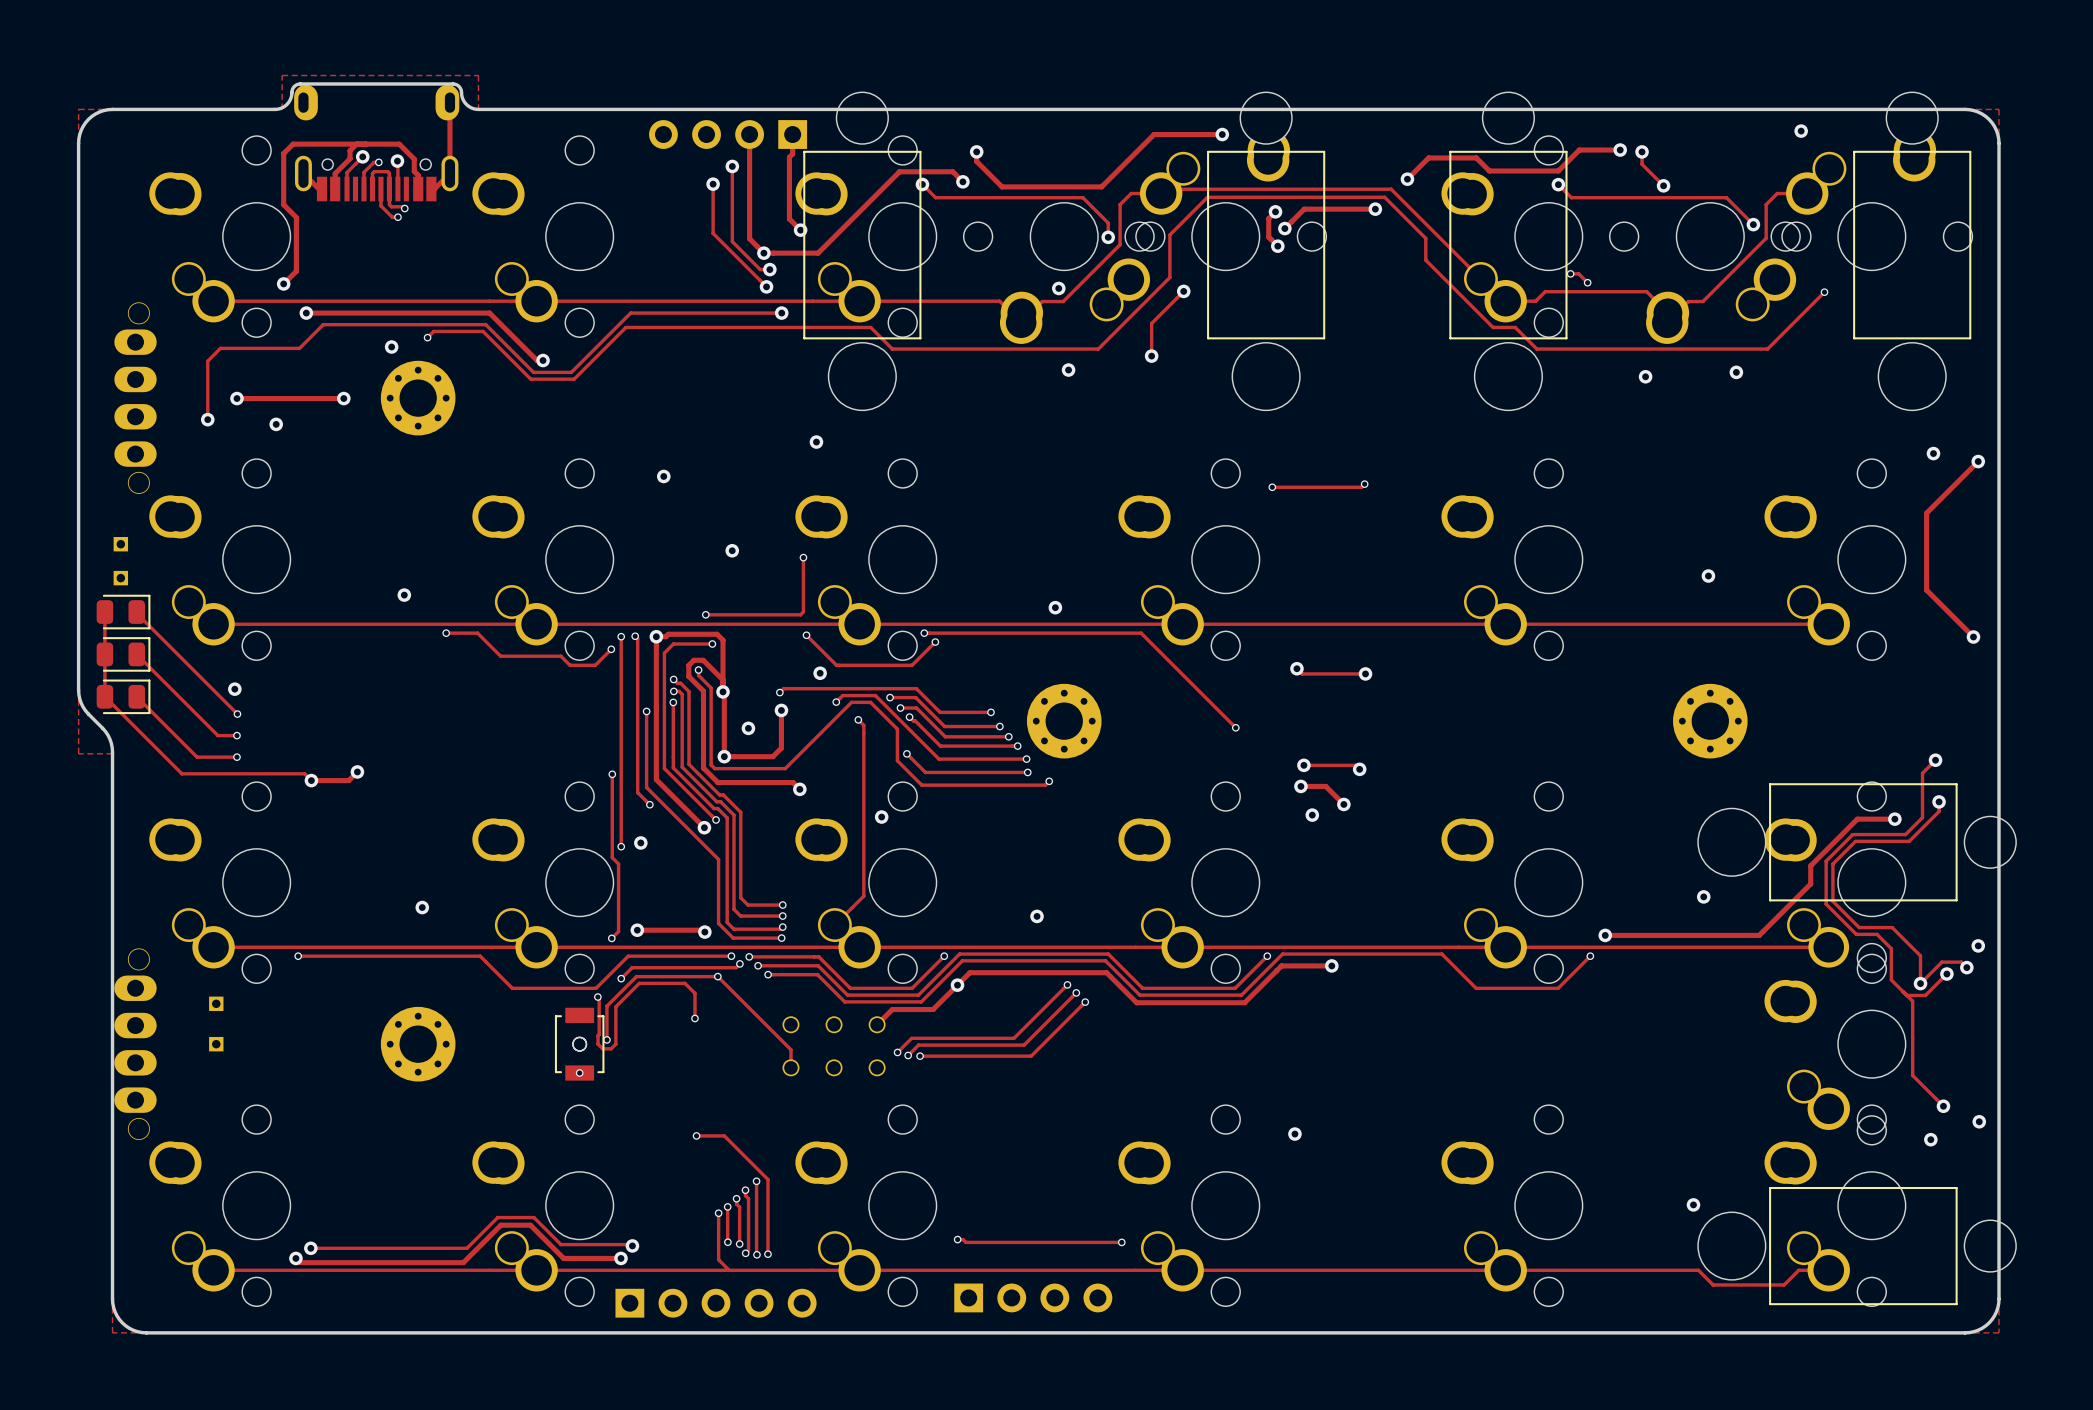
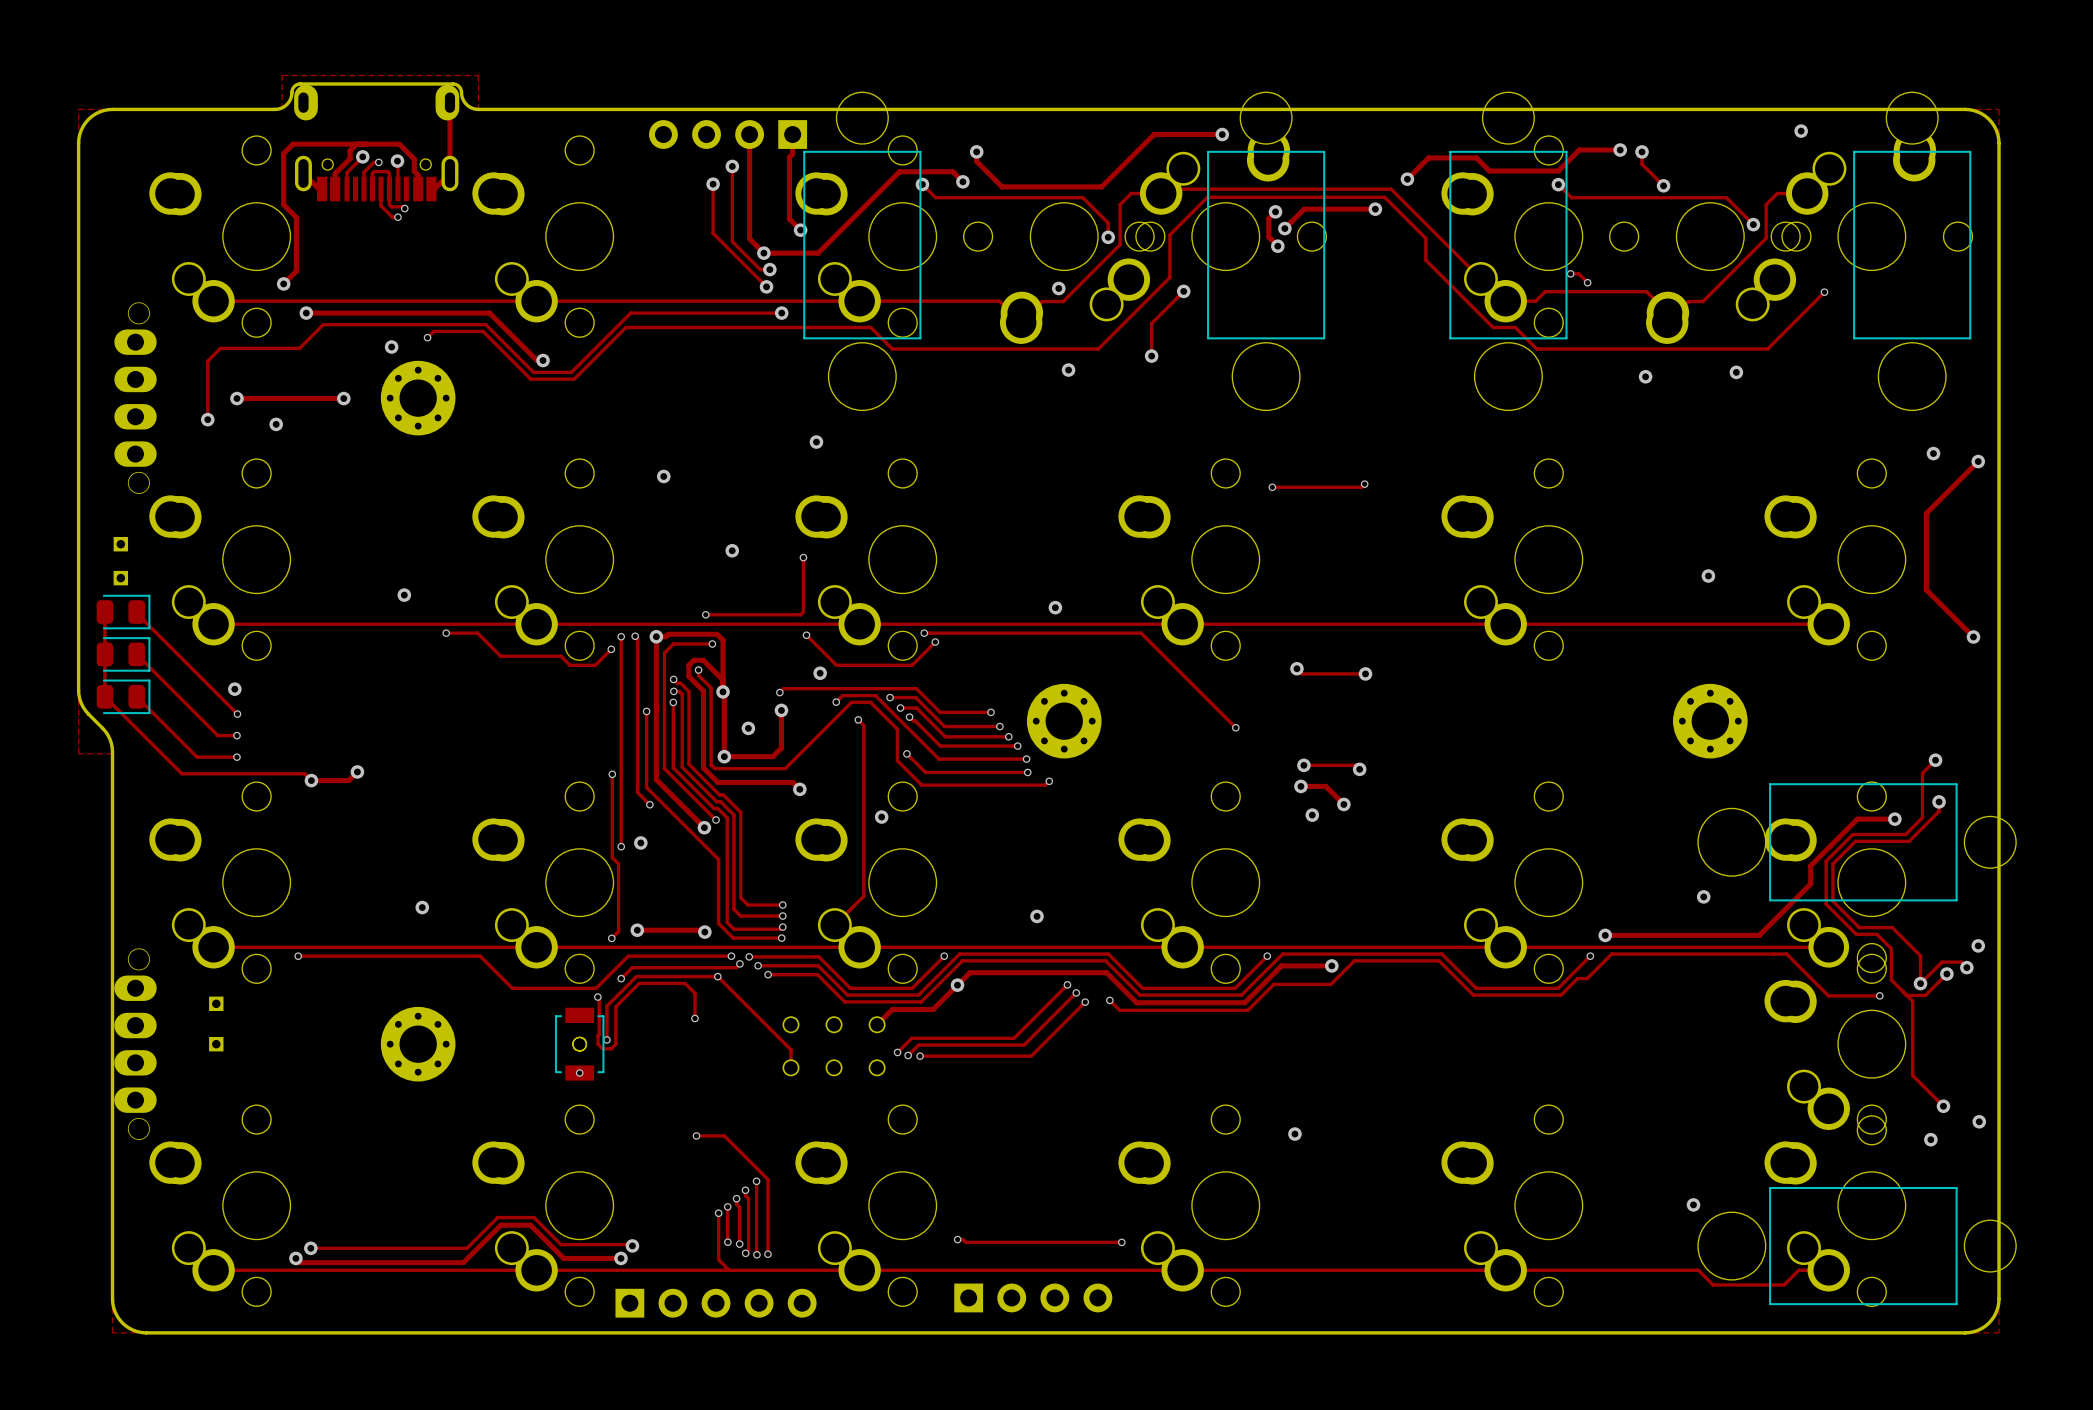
track: none -> (1879, 995) (1828, 995) (1786, 954) (1611, 954) (1587, 978) (1577, 978) (1561, 995) (1473, 995) (1439, 960) (1354, 960) (1330, 984) (1273, 984) (1247, 1010) (1119, 1010) (1109, 1000)
via: none -> (1879, 995)
via: none -> (1109, 1000)

